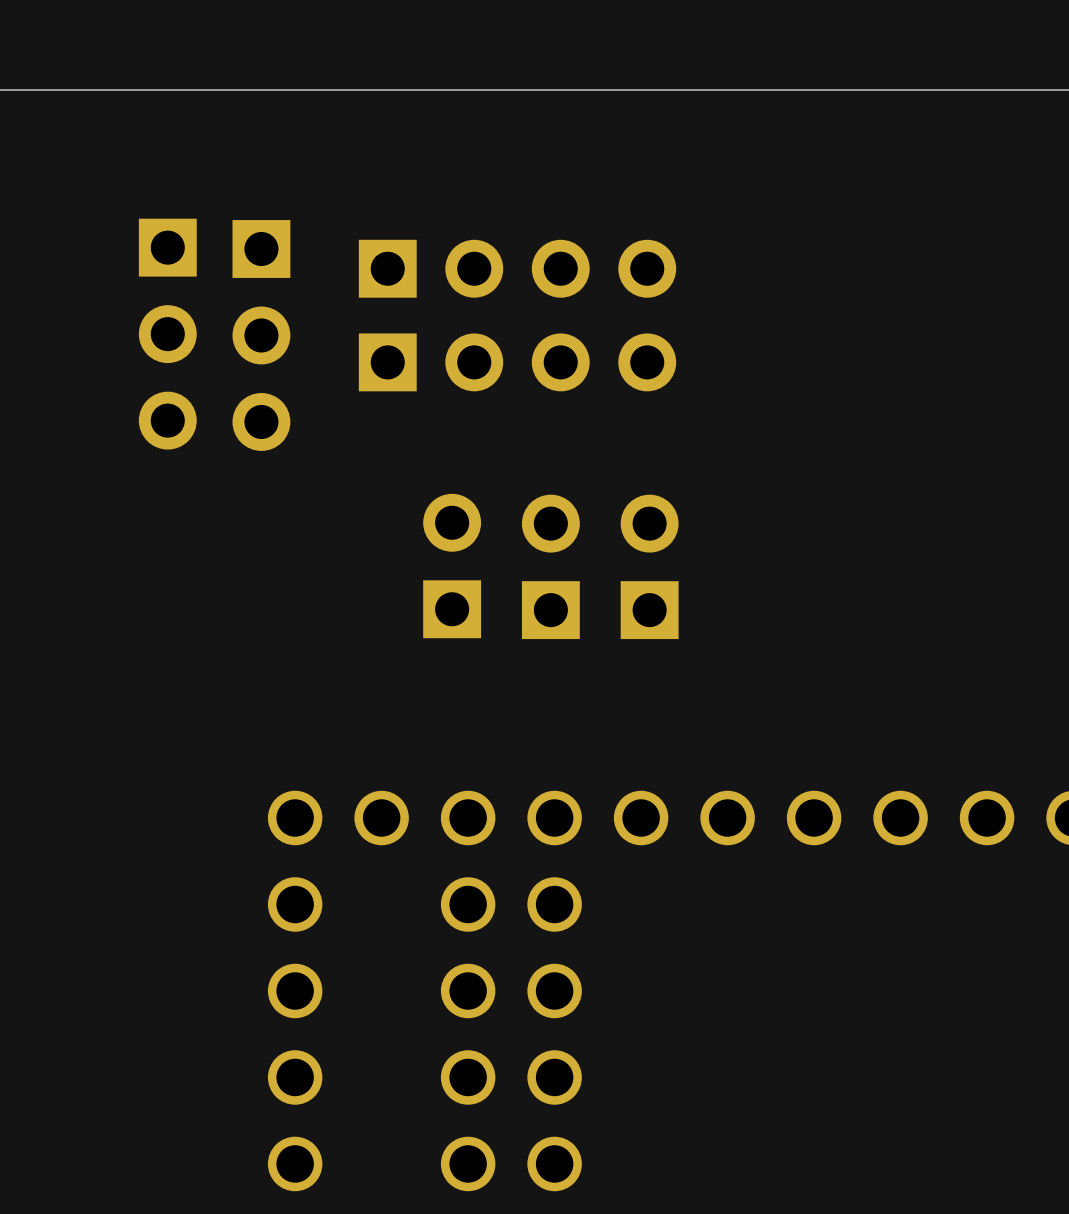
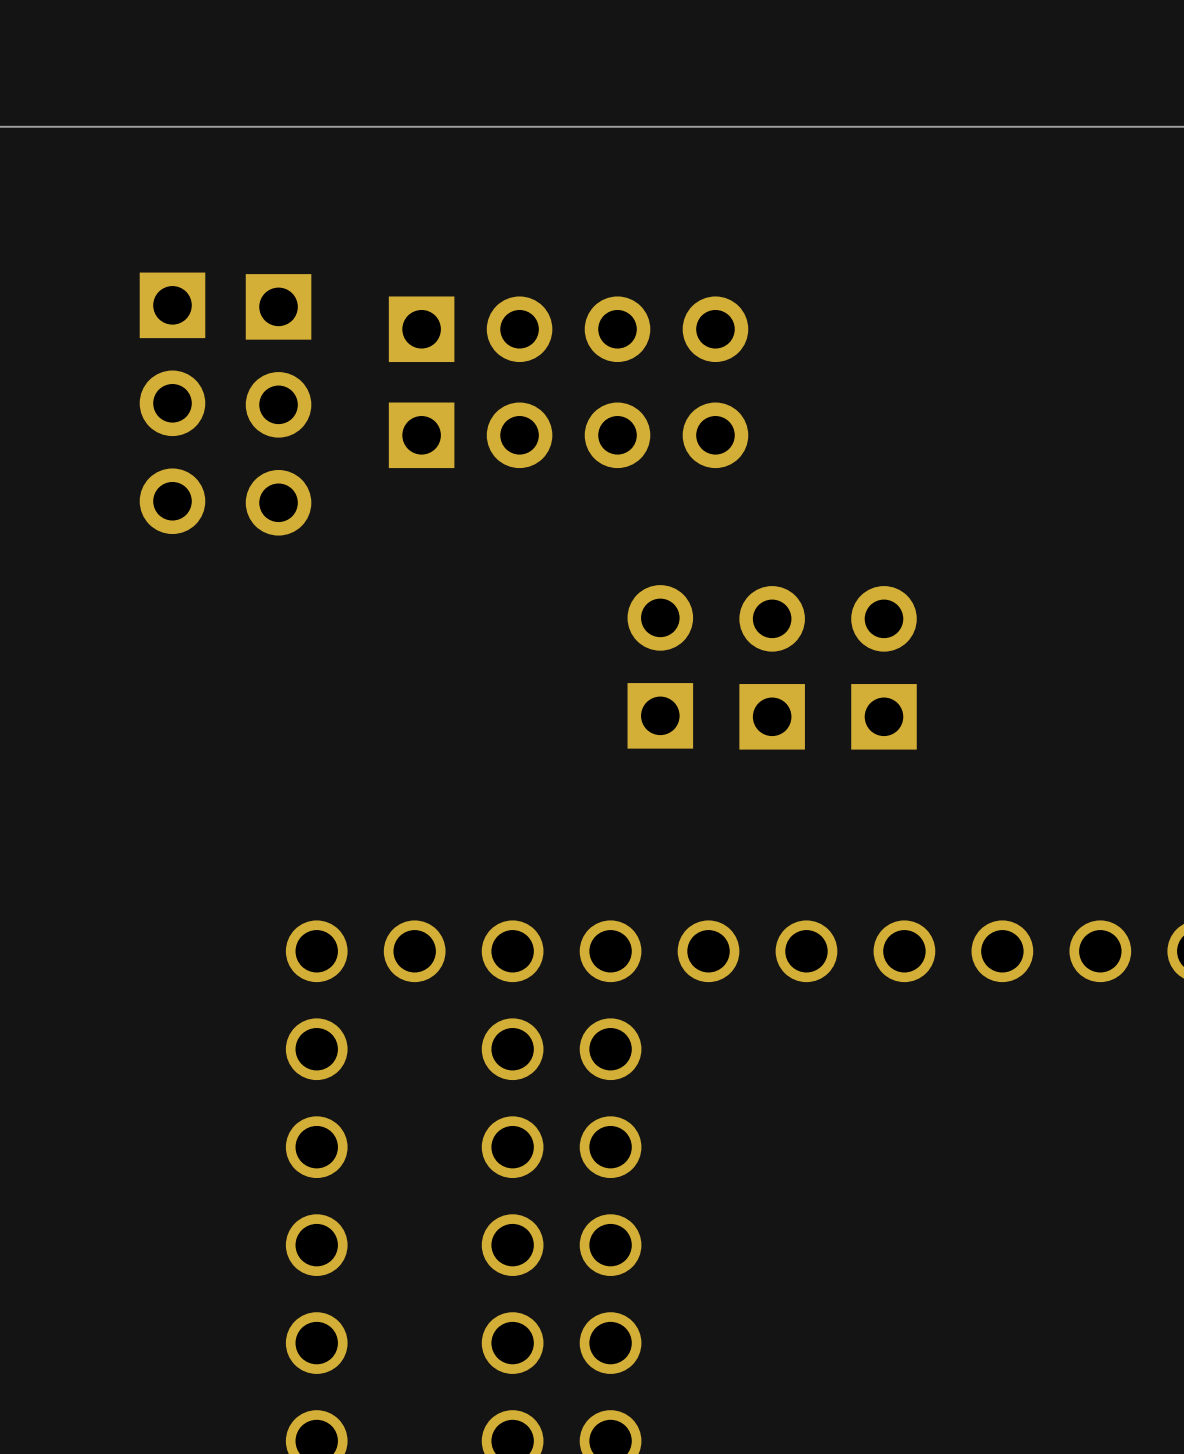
part: (452, 566) -> none
part: (550, 566) -> none
part: none -> (660, 666)
part: (649, 566) -> none
part: none -> (772, 667)
part: none -> (883, 667)

